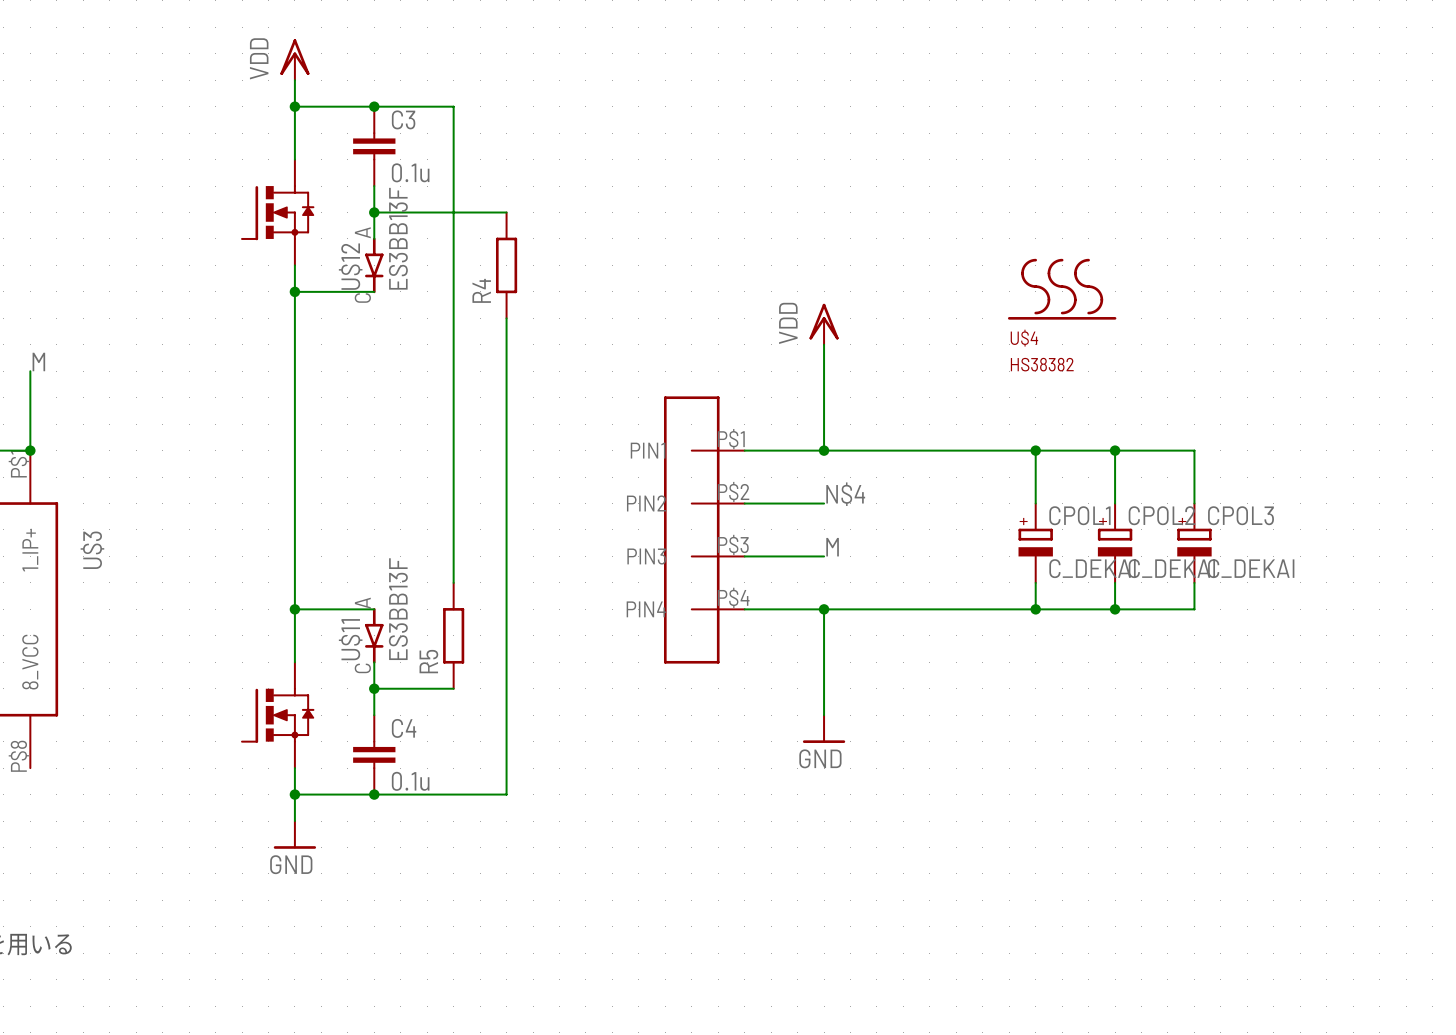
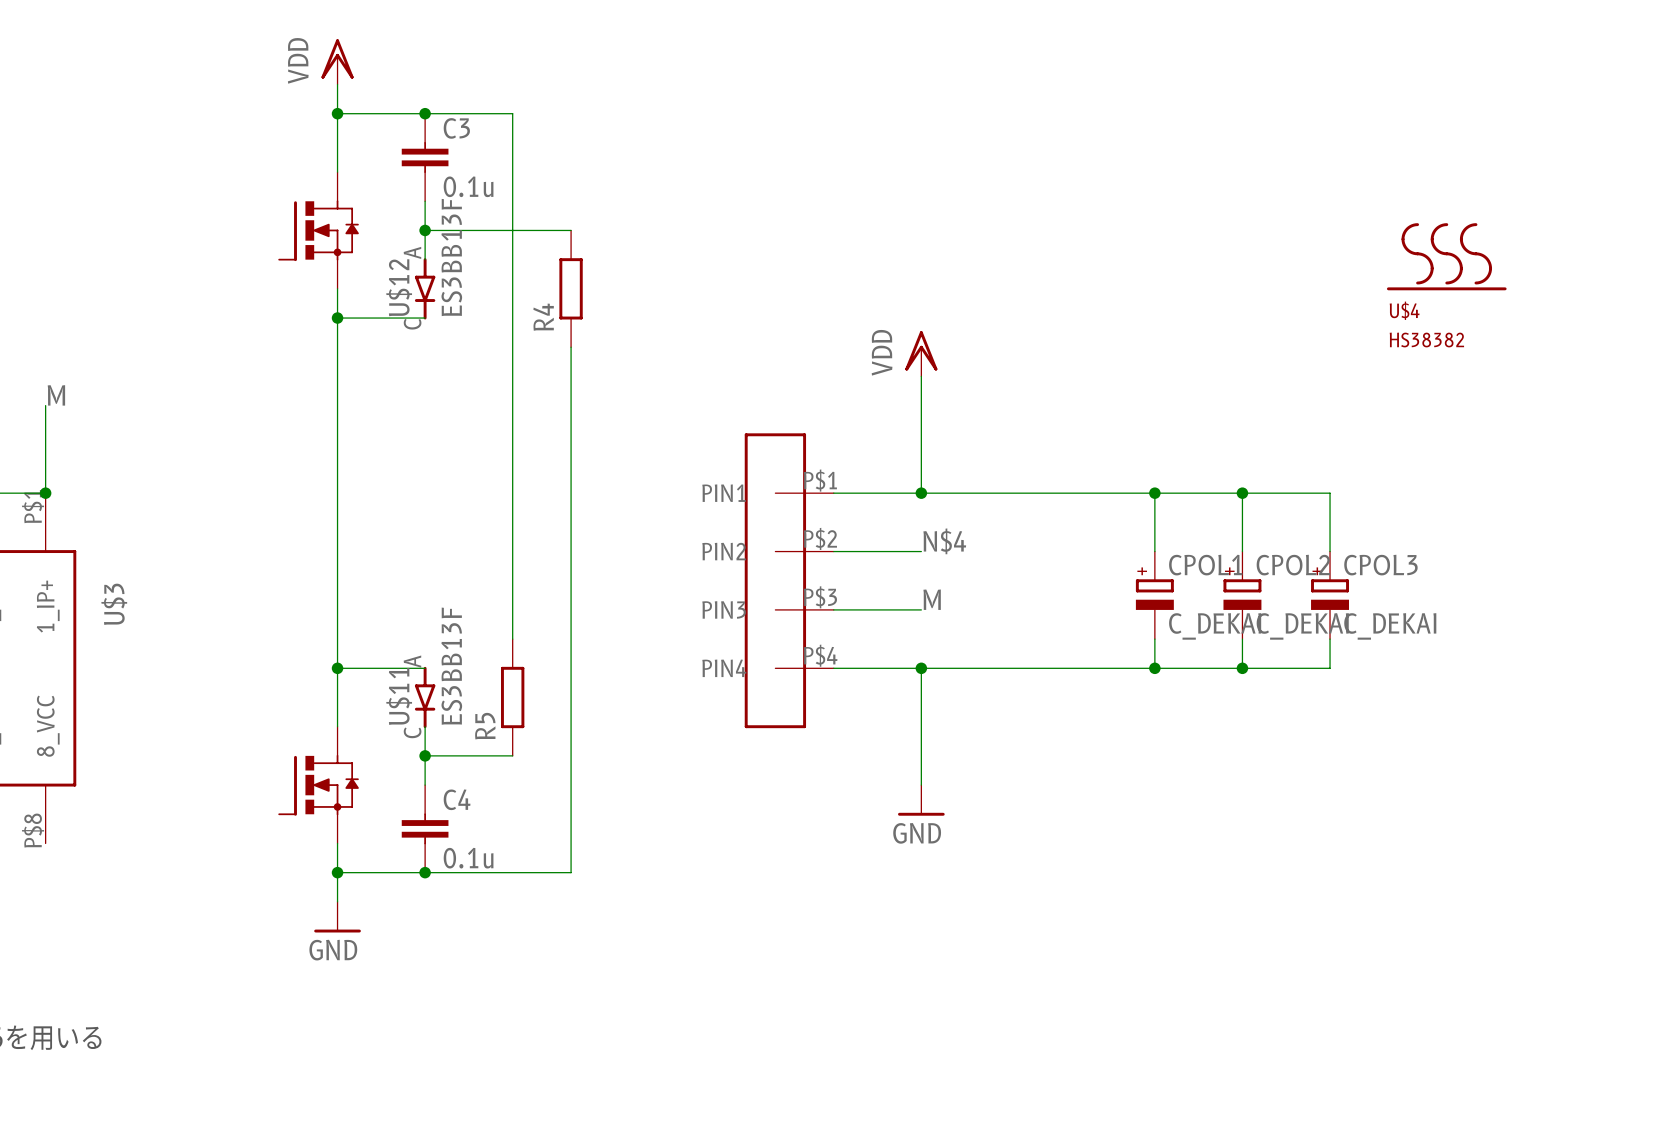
U$4 position: (1062, 289) -> (1446, 256)

